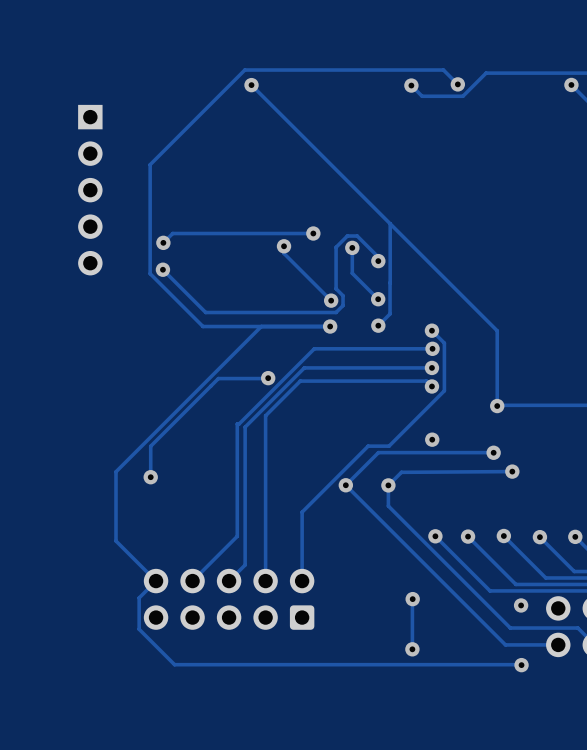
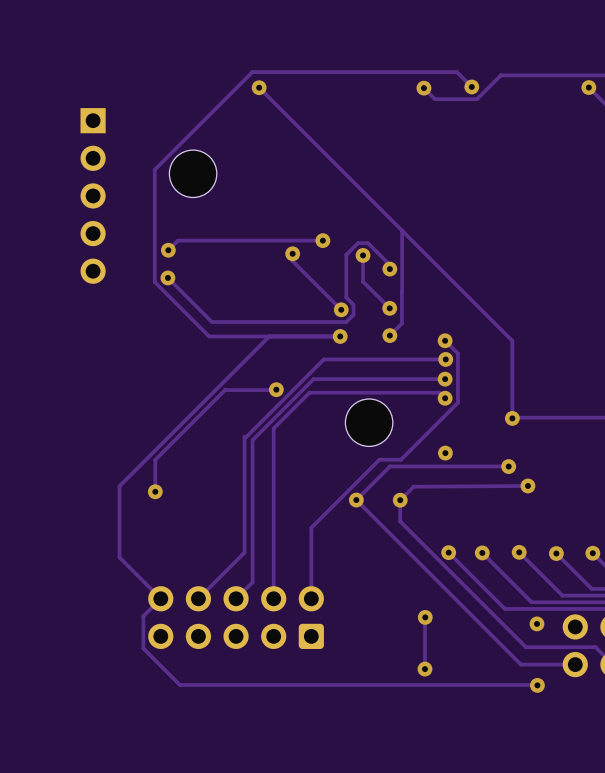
part: none -> (193, 173)
part: none -> (369, 422)

